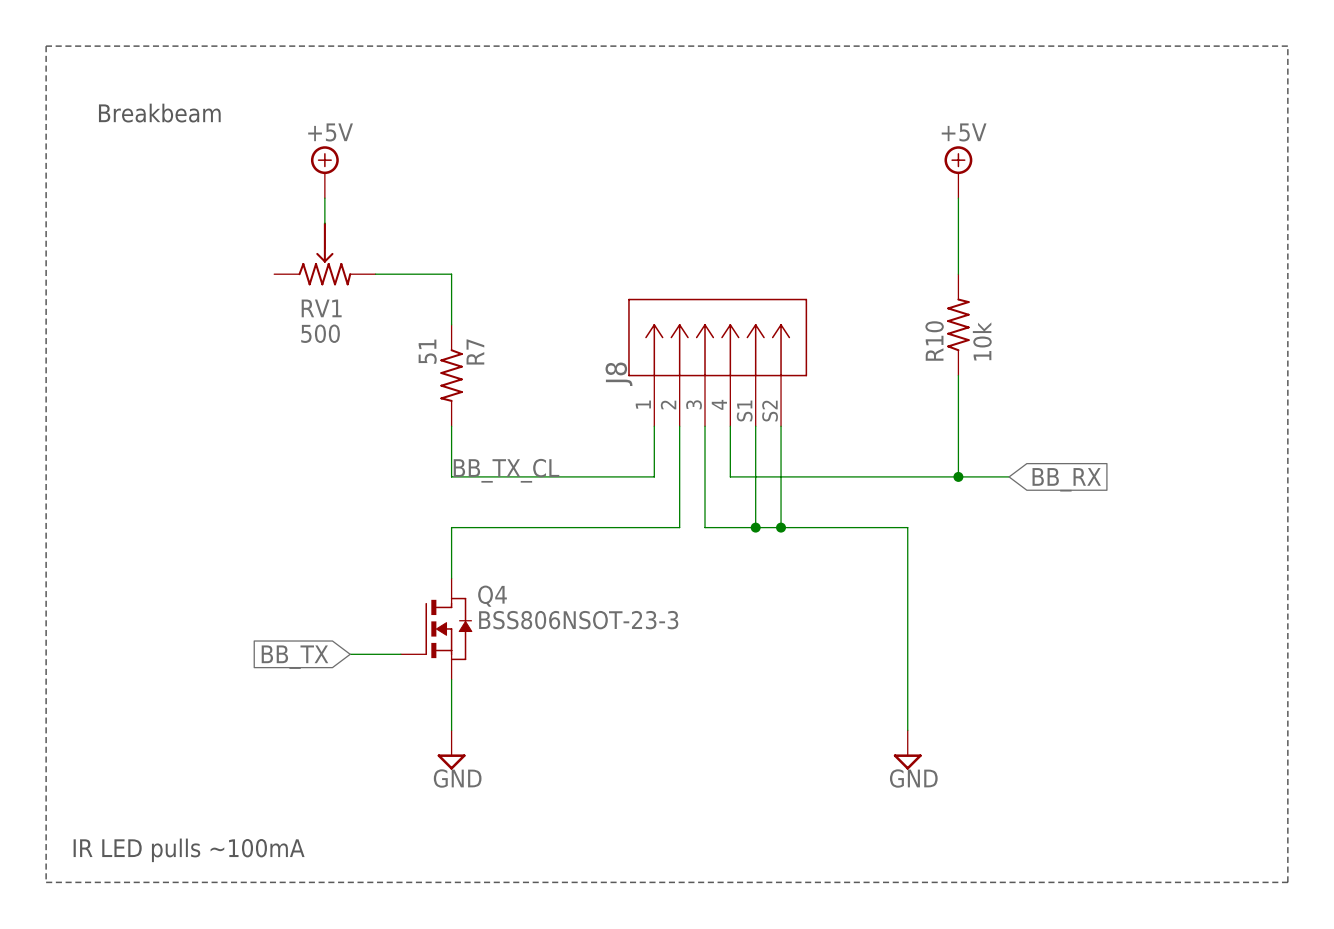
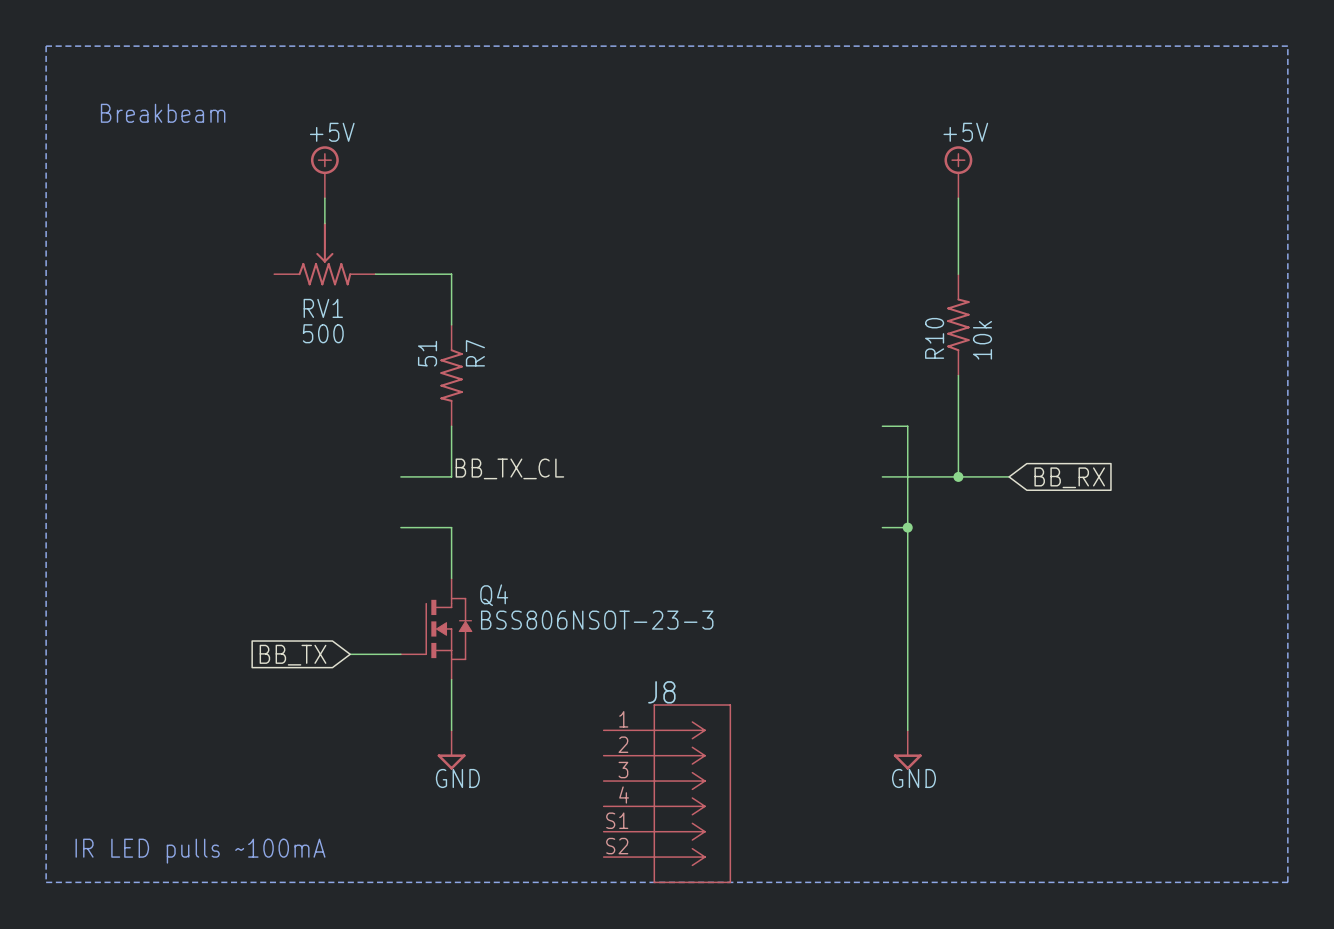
J8 rotation: 0° (717, 337) -> 90° clockwise (692, 793)
J8 position: (717, 362) -> (667, 793)
wire: (654, 426) (654, 476) (451, 476) -> (400, 476) (451, 476)
wire: (679, 426) (679, 527) (451, 527) -> (400, 527) (451, 527)
wire: (705, 426) (705, 527) (882, 527) -> none
wire: (730, 426) (730, 476) (882, 476) -> none
wire: (755, 426) (755, 527) -> none
wire: (781, 426) (781, 527) -> none
wire: none -> (882, 426) (907, 426) (907, 527)
junction: (755, 527) -> none
junction: (781, 527) -> none
junction: none -> (907, 527)

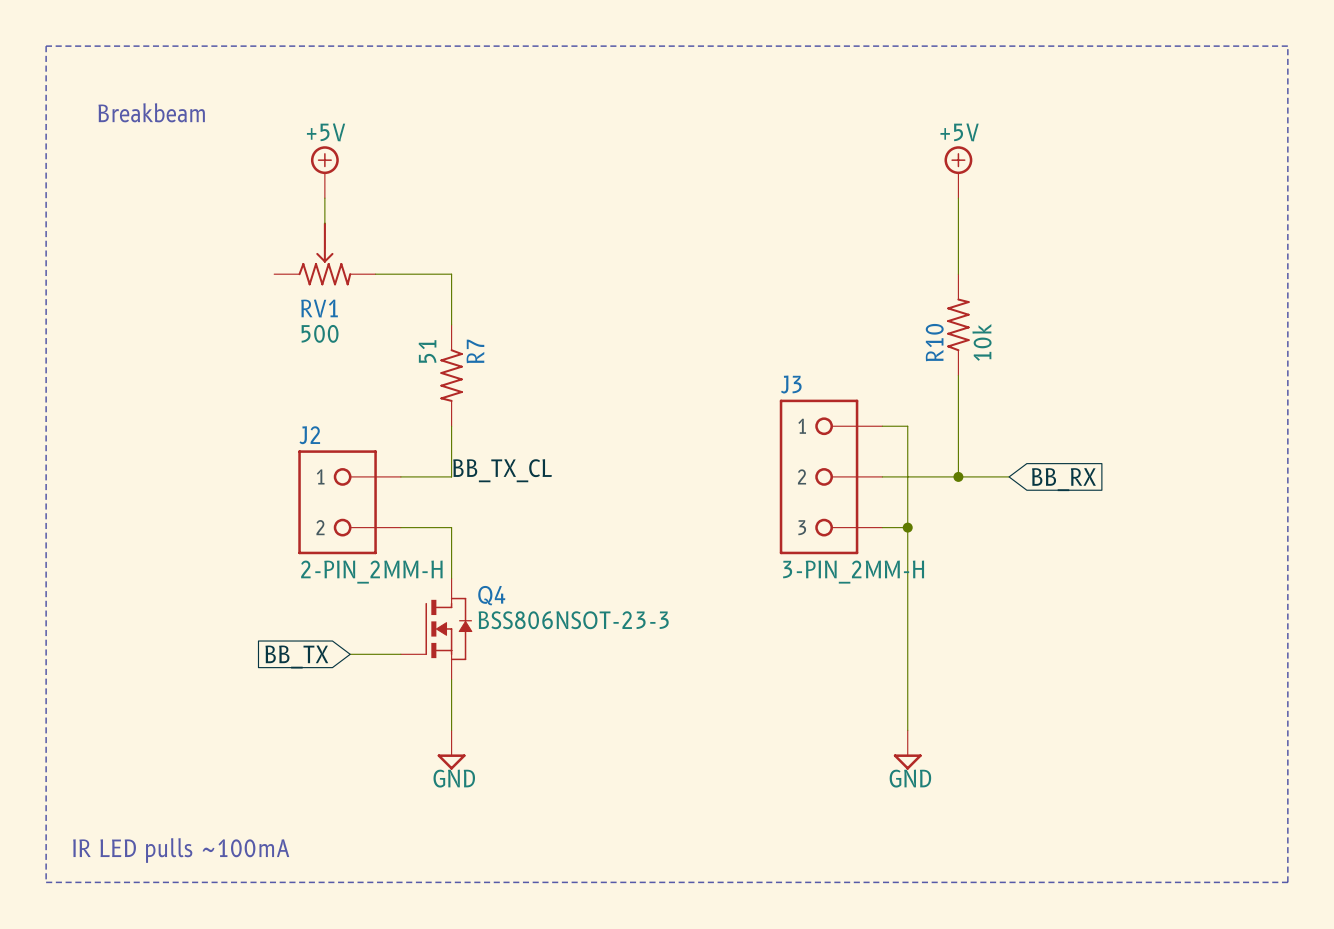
J3: none -> 3-PIN_2MM-H (831, 476)
J2: none -> 2-PIN_2MM-H (349, 502)
J8: (667, 793) -> none

